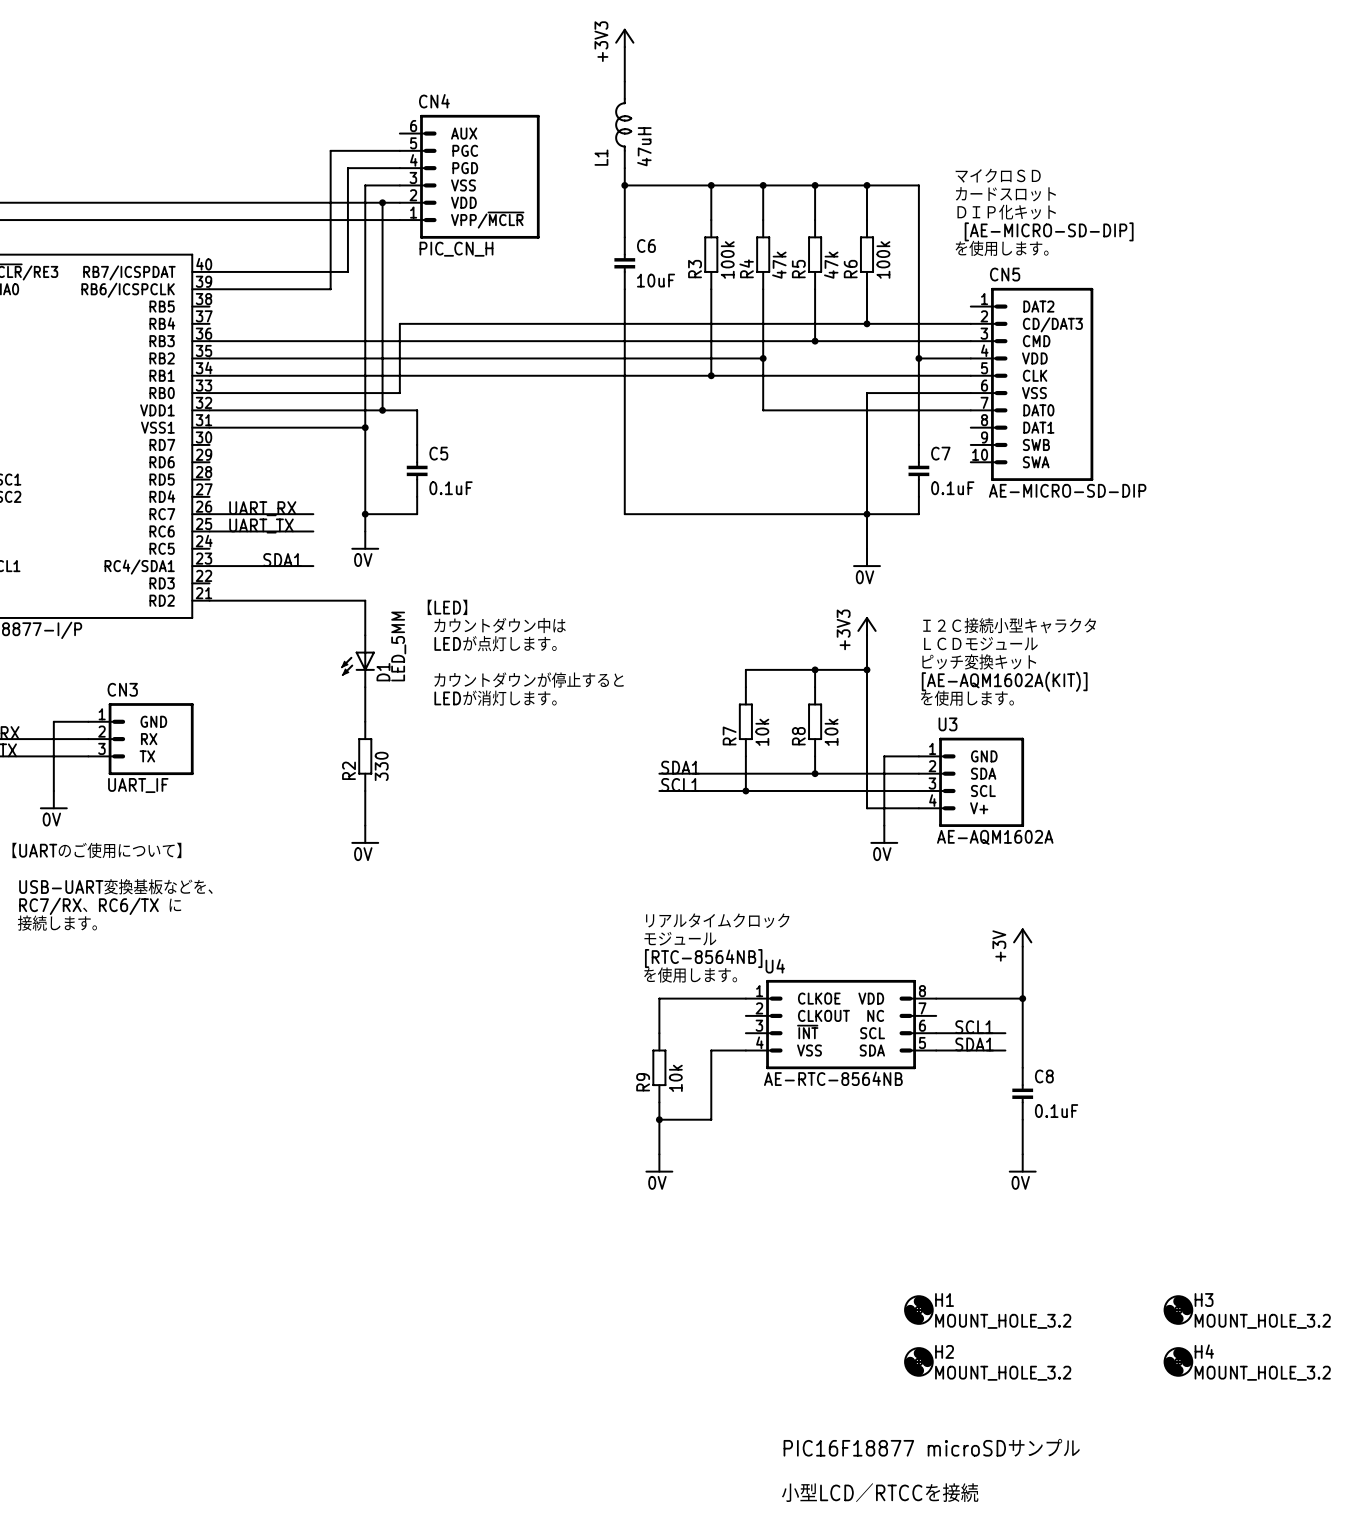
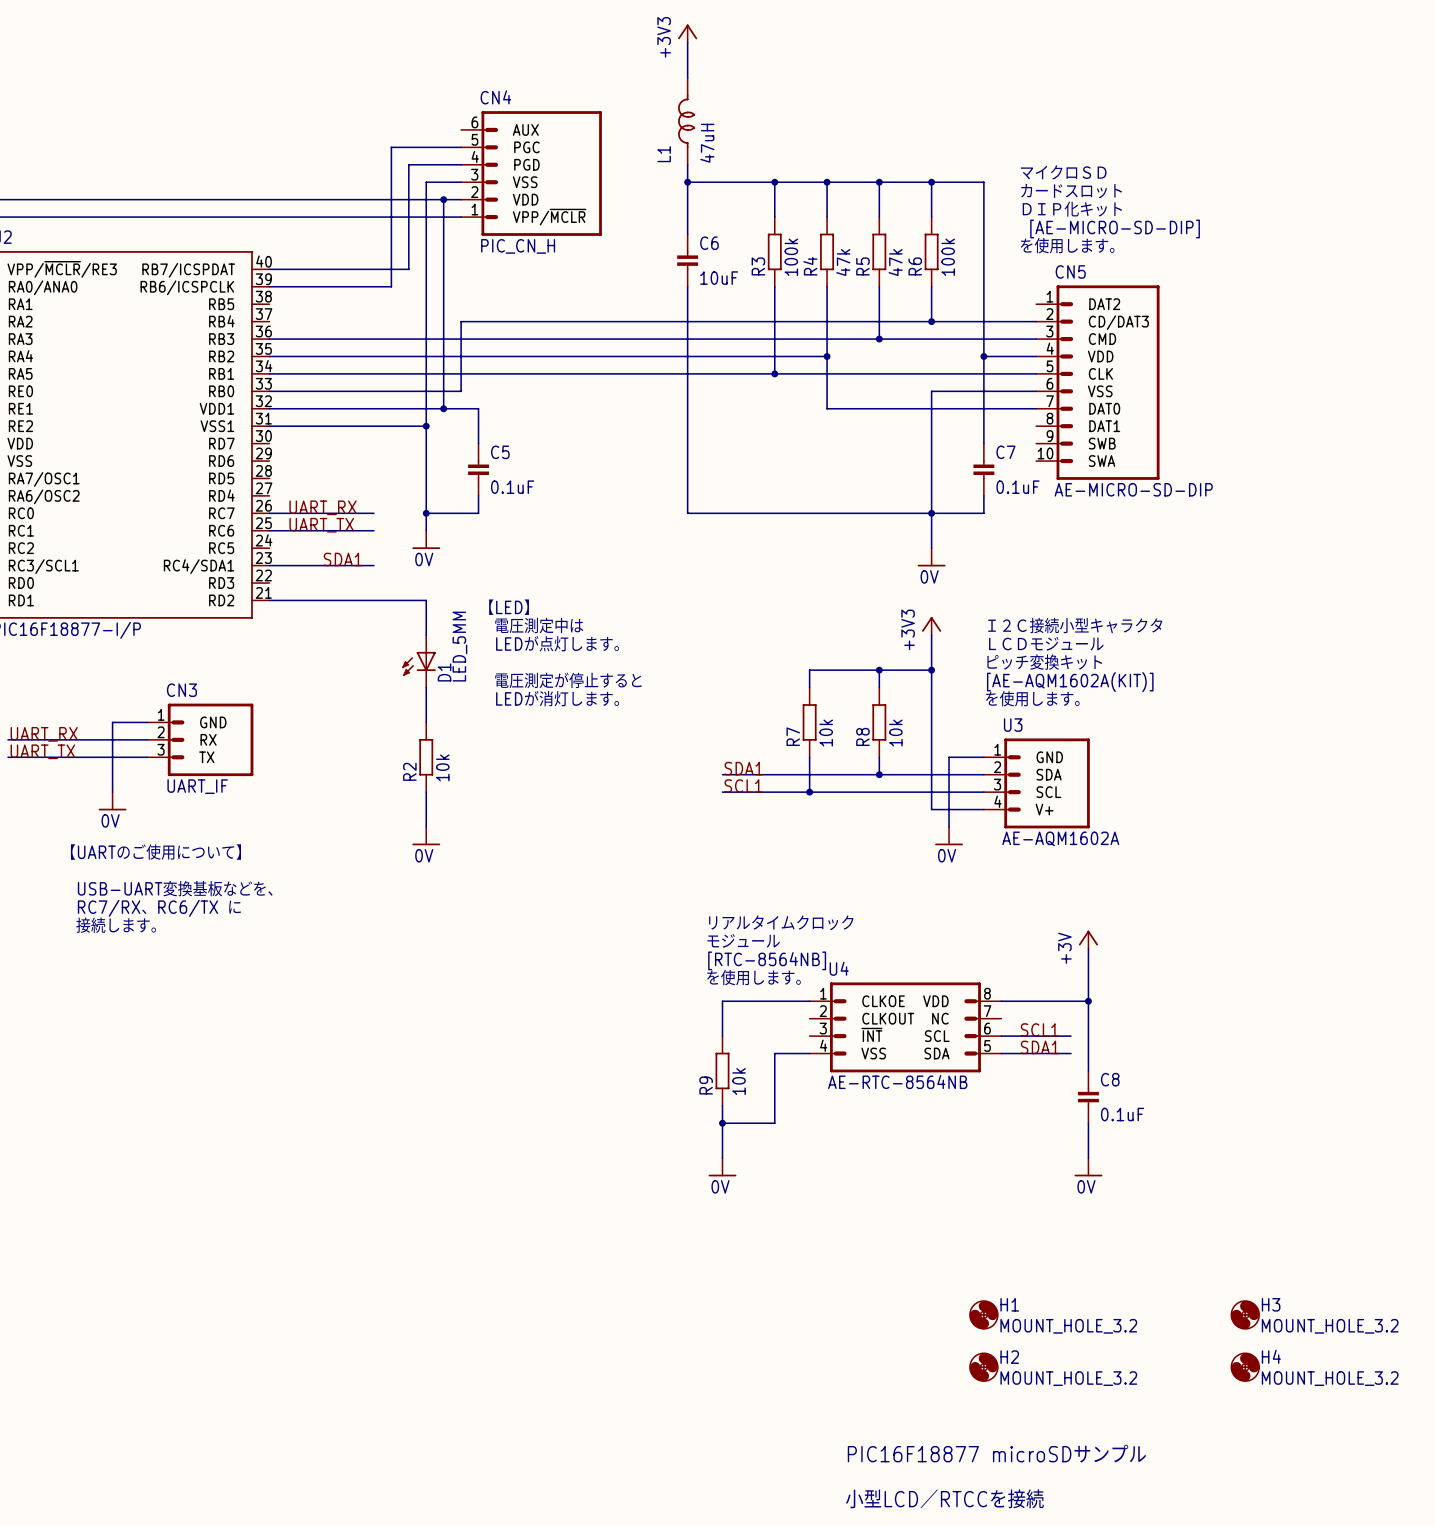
text: カウントダウン中は (500, 625) -> 電圧測定中は (539, 625)
text: カウントダウンが停止すると (528, 680) -> 電圧測定が停止すると (568, 680)
R2 value: 330 (381, 766) -> 10k (442, 767)

